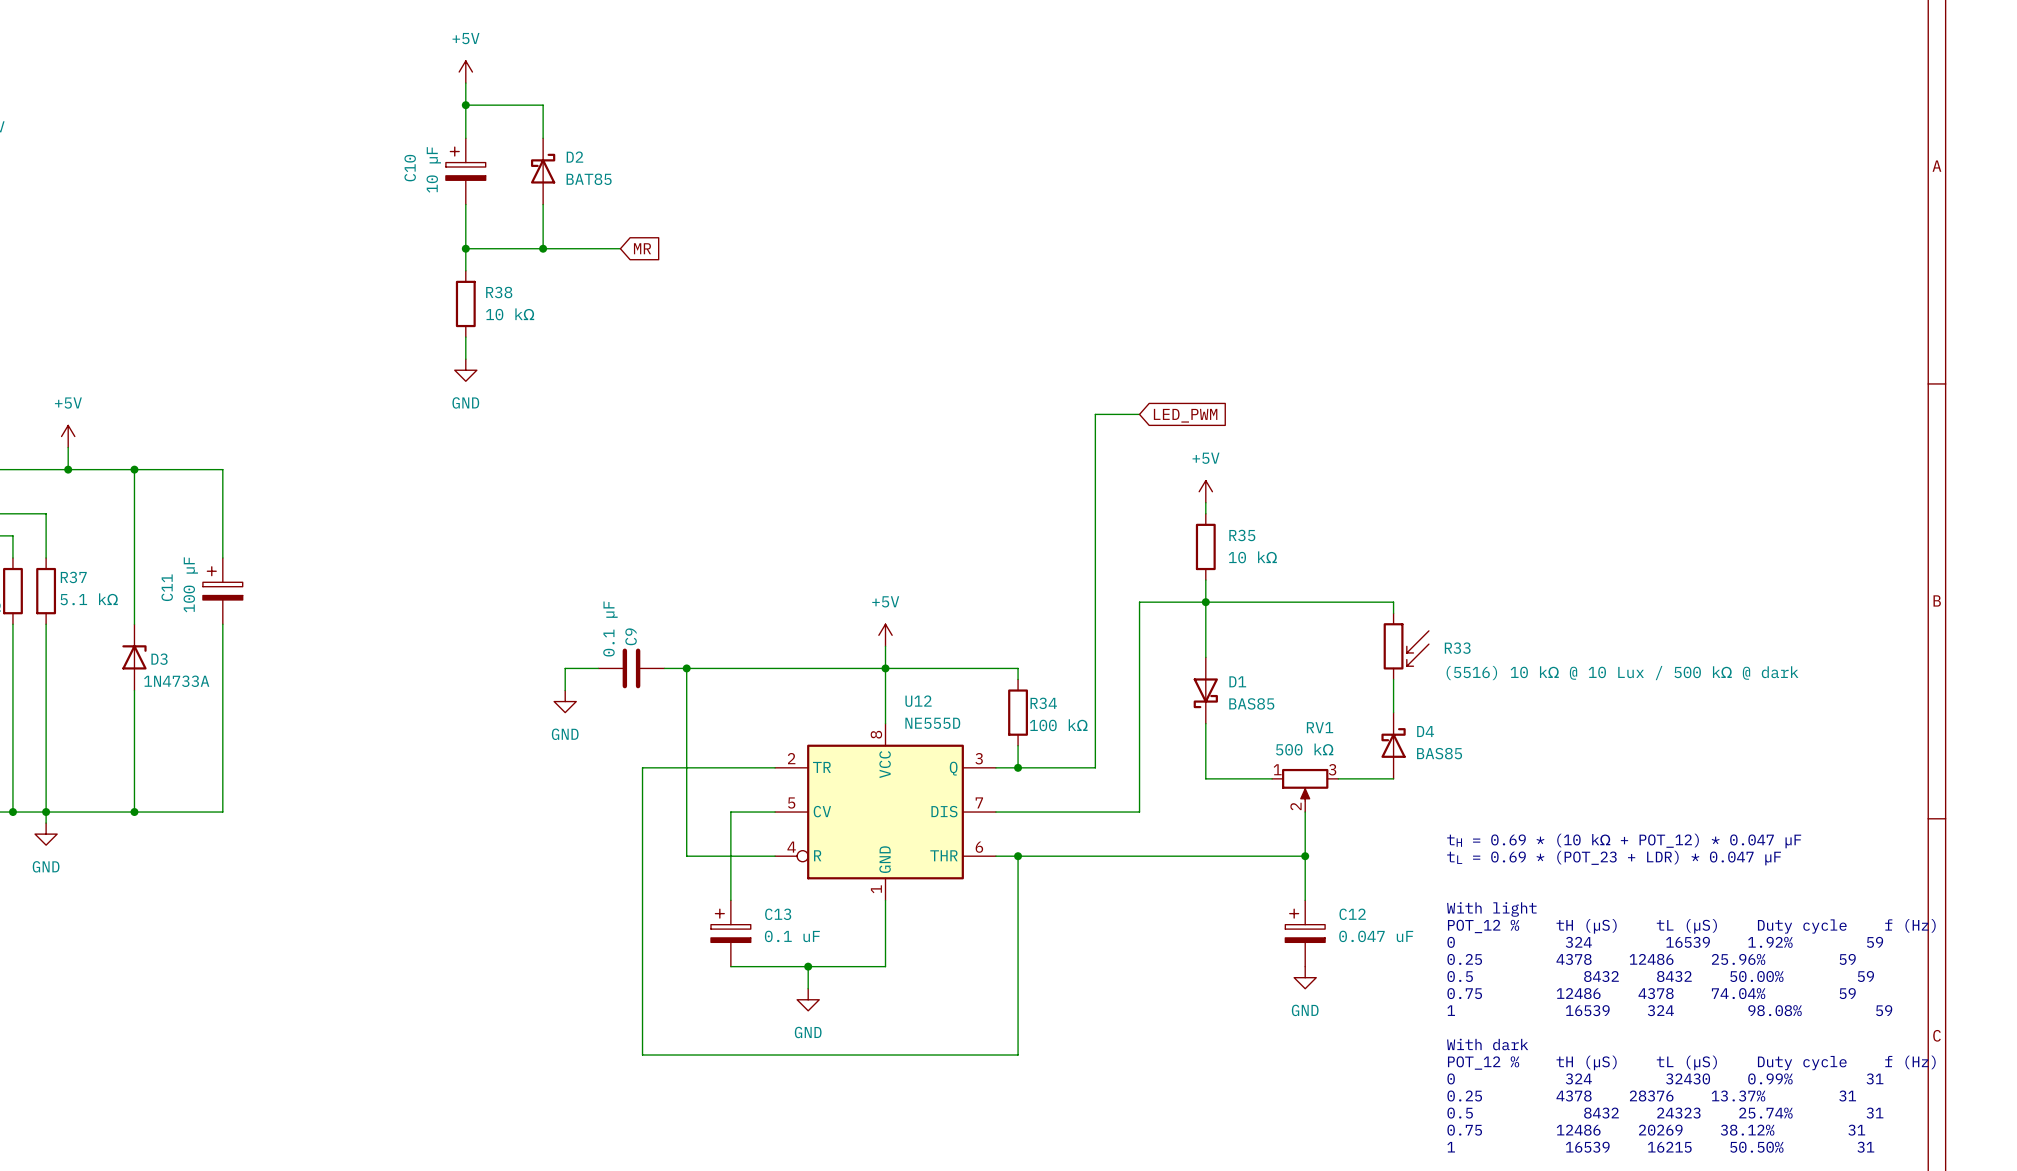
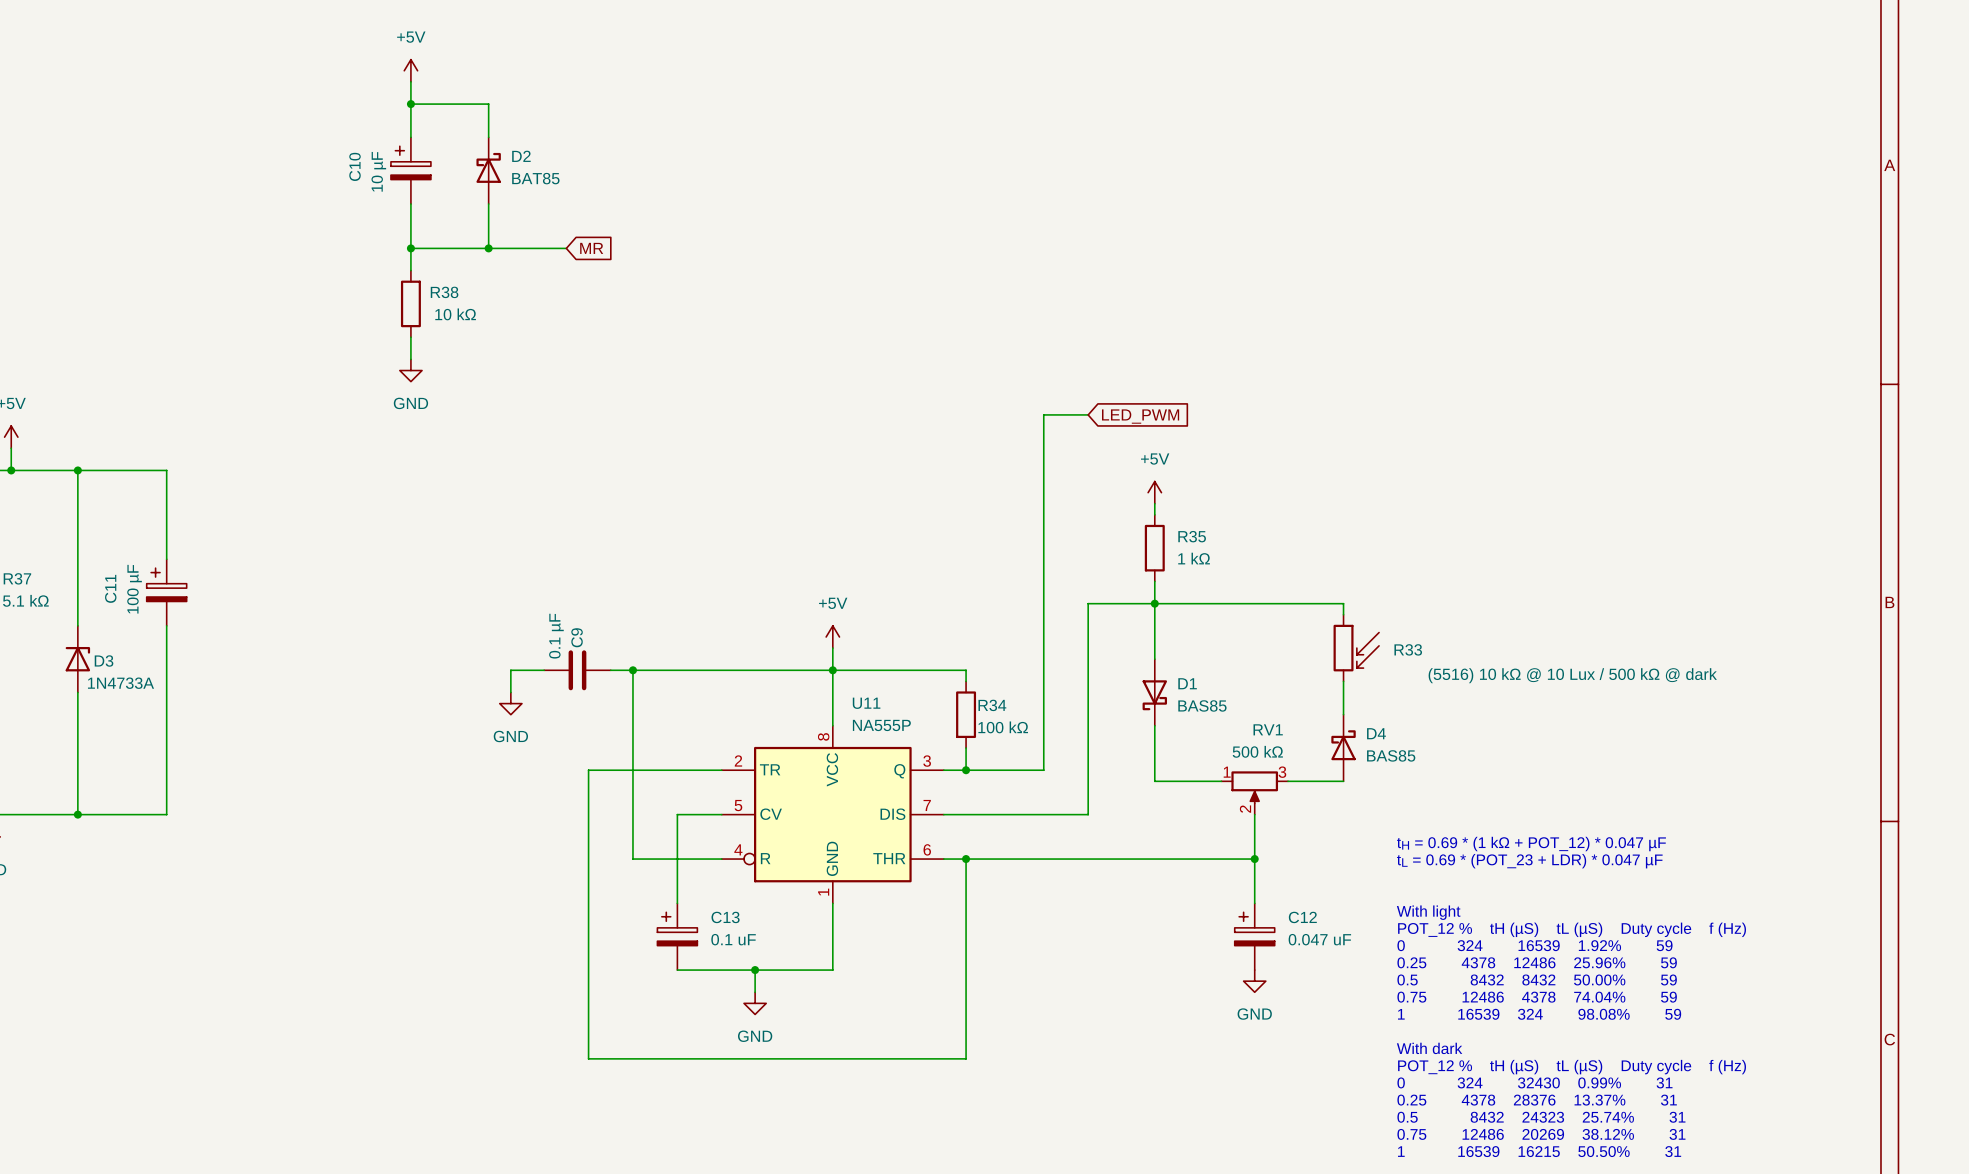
R35 value: 10 kΩ (1252, 557) -> 1 kΩ (1194, 558)
U12 name: U12 (918, 701) -> U11 (866, 703)
U12 value: NE555D (932, 723) -> NA555P (881, 725)
text: tH = 0.69 * (10 kΩ + POT_12) * 0.047 µF (1624, 840) -> tH = 0.69 * (1 kΩ + POT_12) * 0.047 µF (1531, 844)

